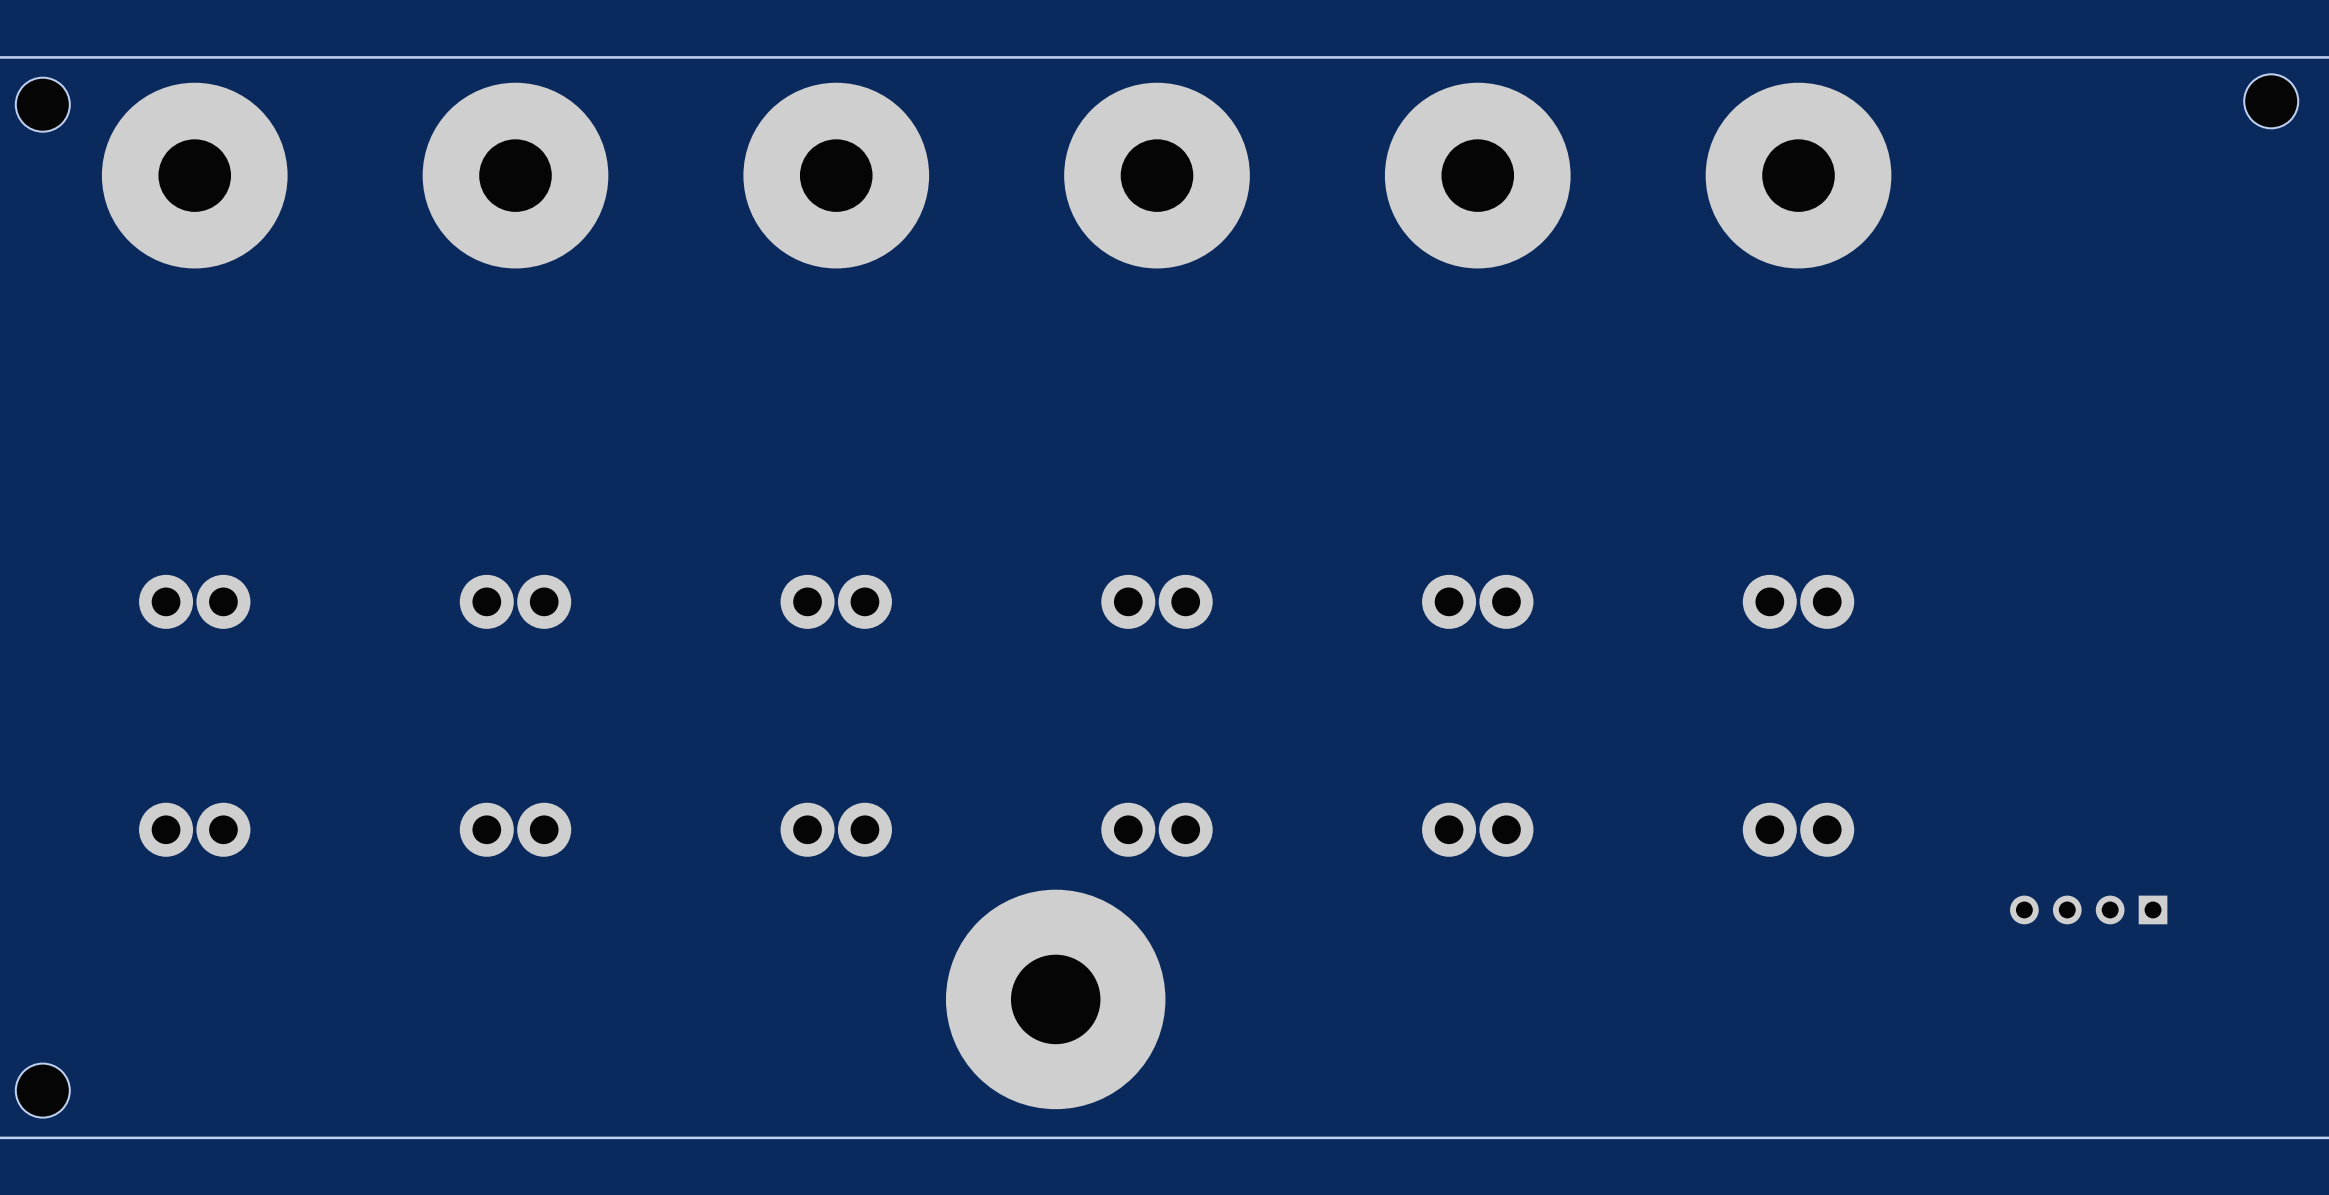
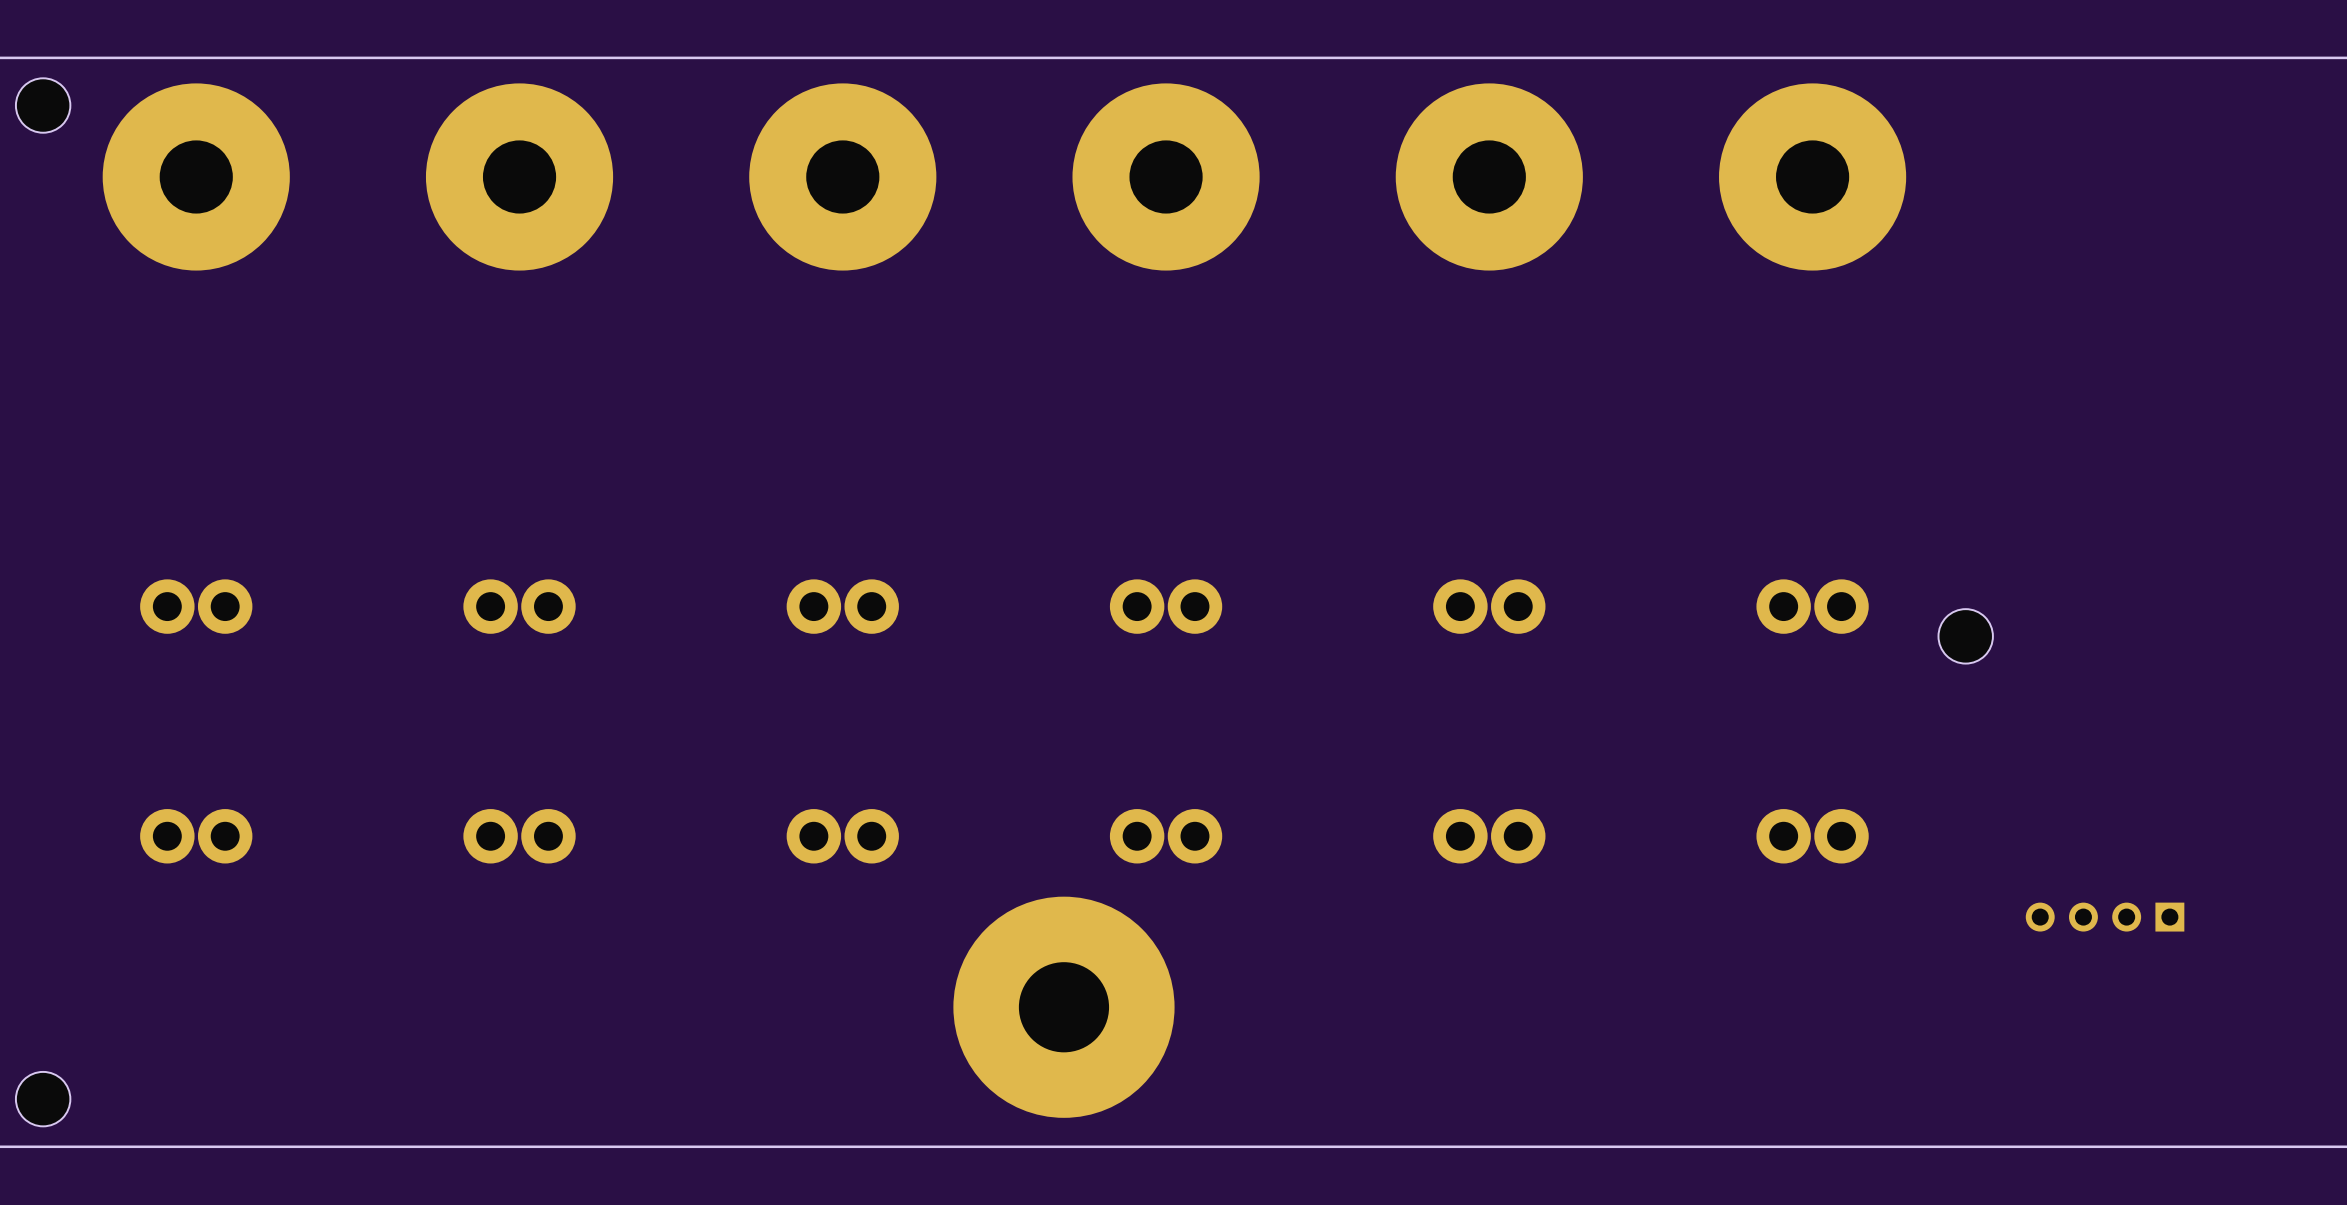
part: (2271, 101) -> none
part: none -> (1965, 636)

